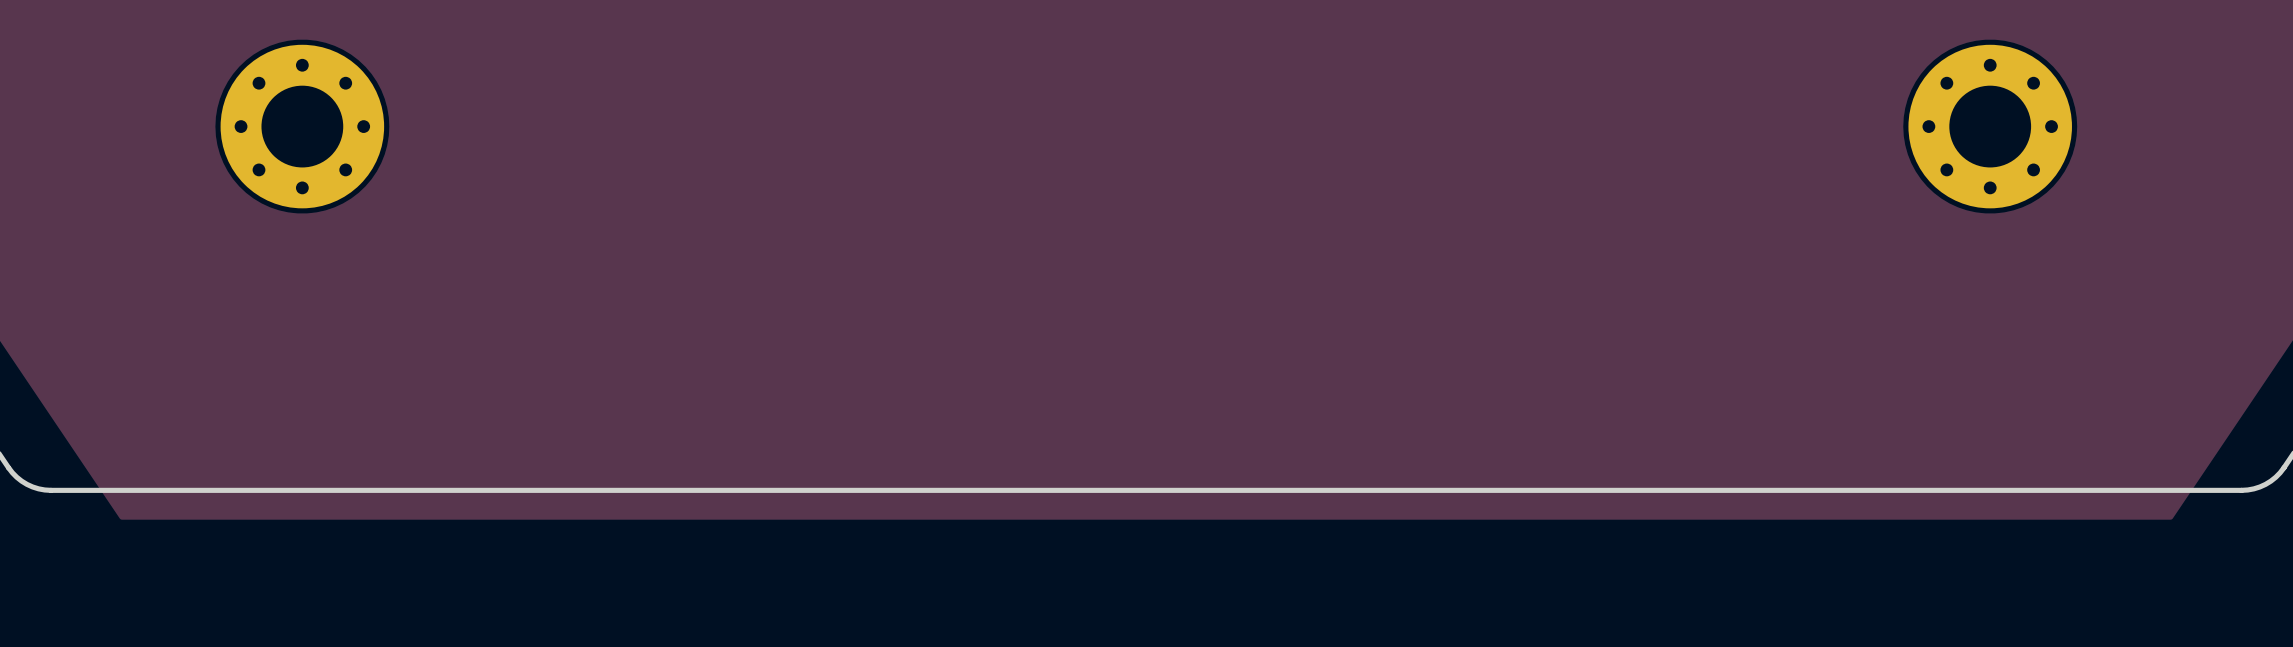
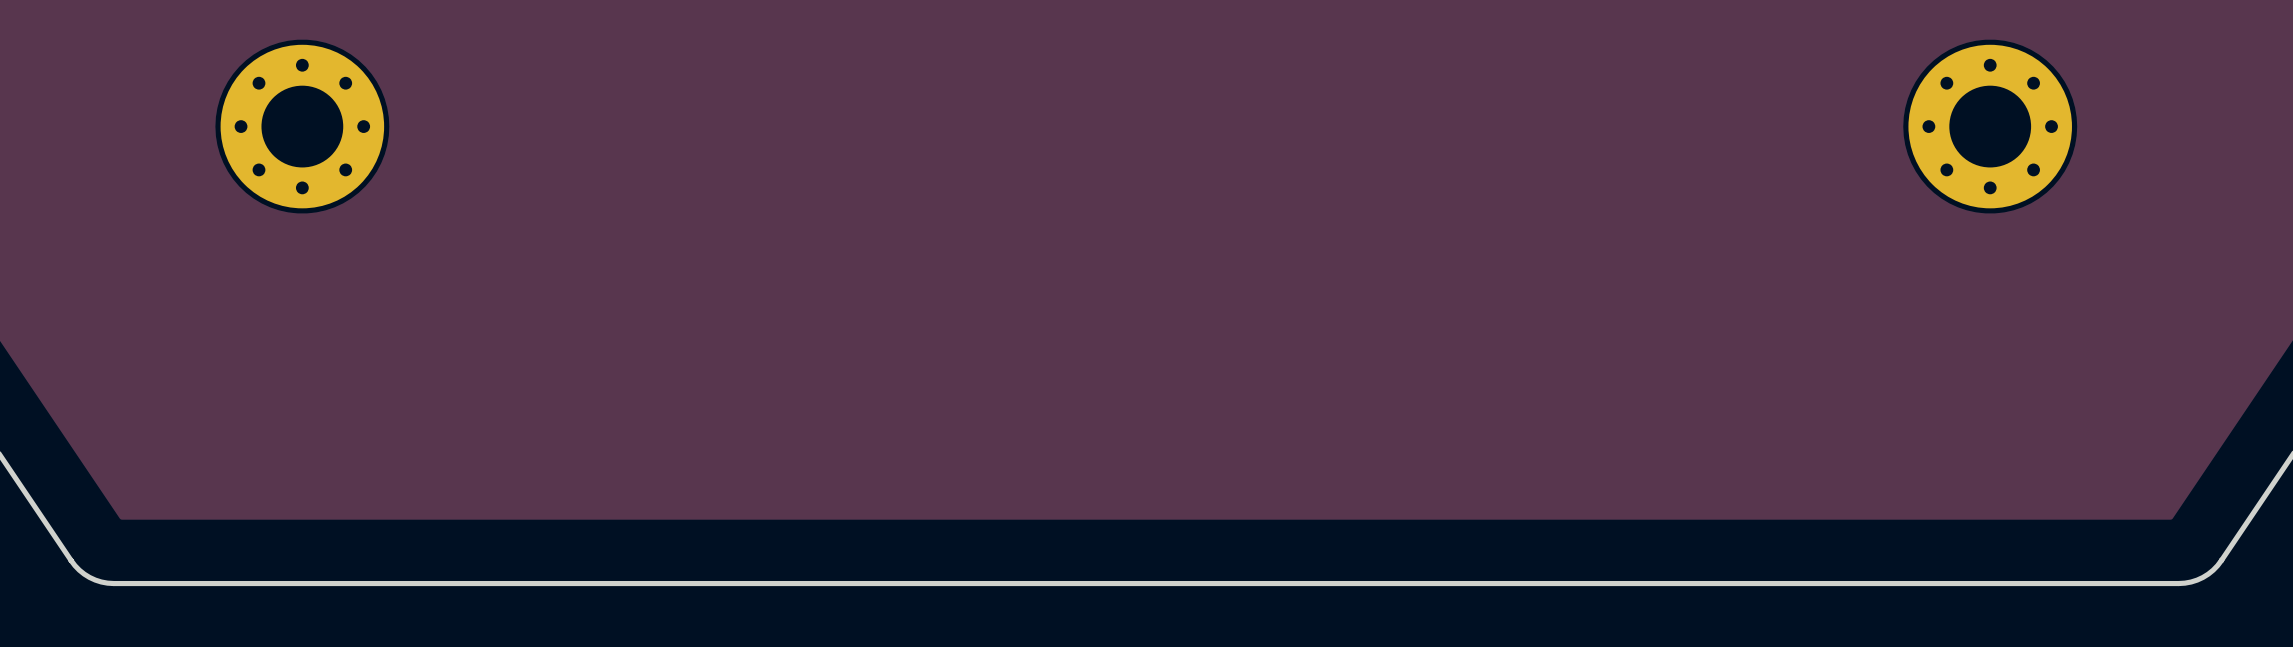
board edge: (8, 467) (16, 477) (26, 484) (38, 488) (50, 490) (2241, 490) (2253, 488) (2265, 484) (2275, 477) (2283, 467) -> (8, 467) (74, 565) (84, 574) (95, 580) (113, 583) (2178, 583) (2197, 580) (2208, 574) (2217, 565) (2283, 467)

